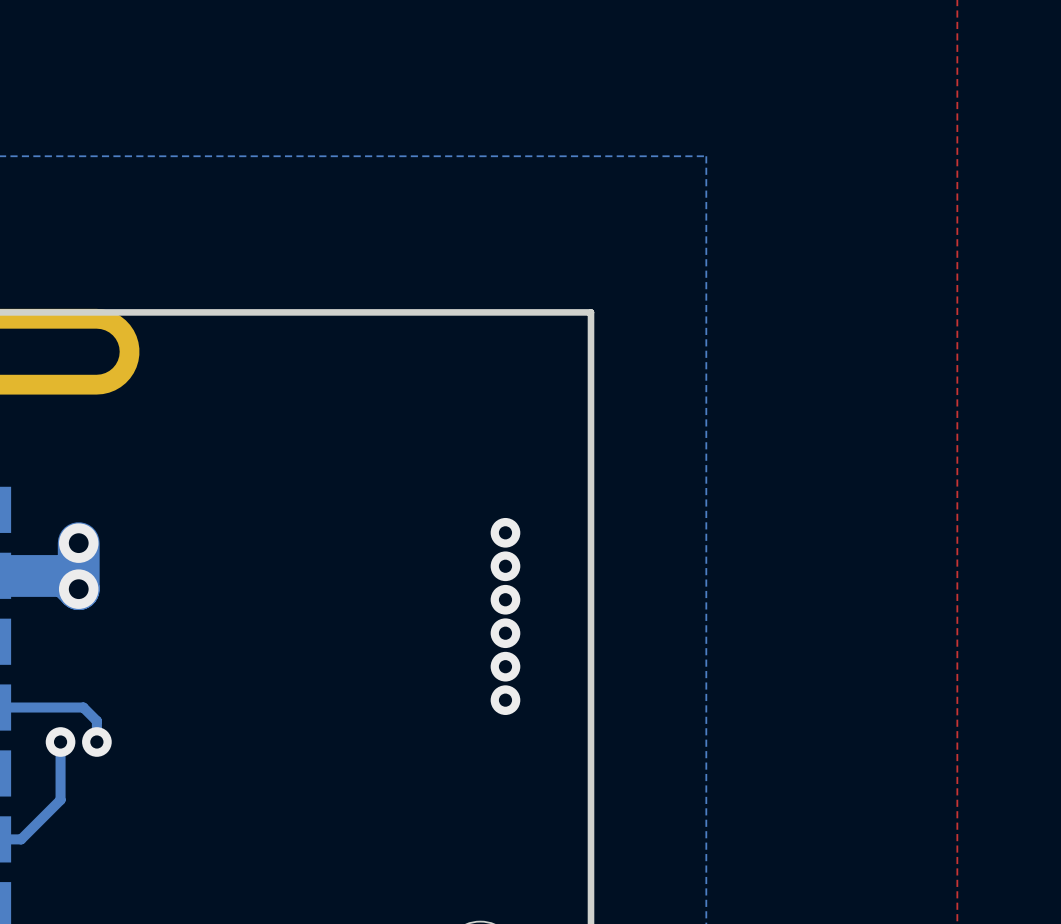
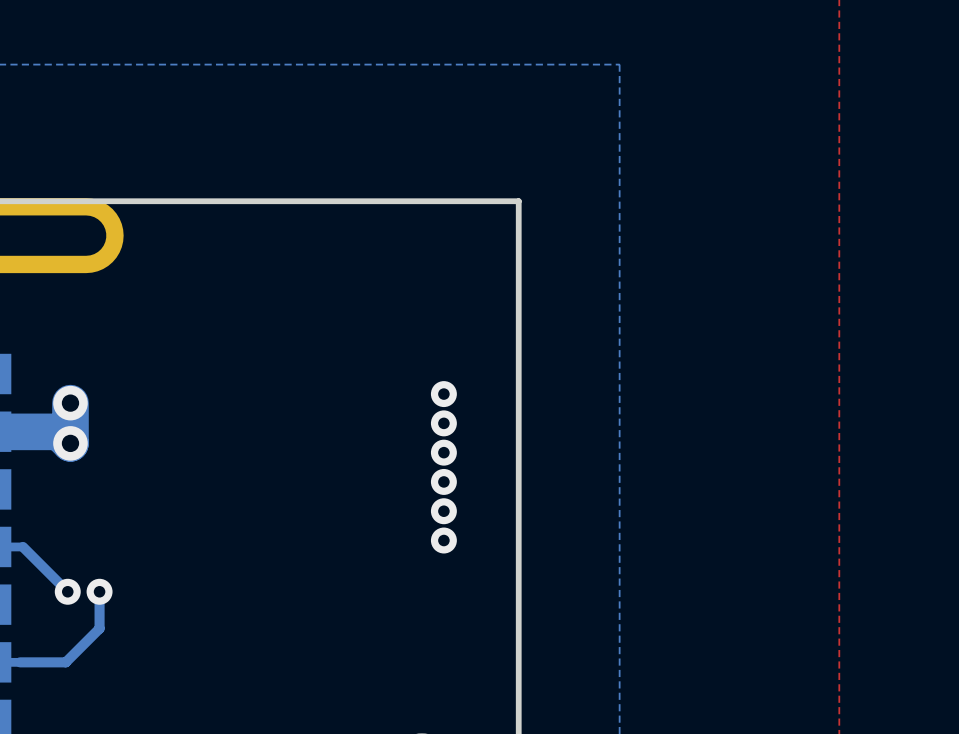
bottom track: (24, 707) (83, 707) (96, 721) (96, 741) -> (22, 546) (67, 591)
bottom track: (60, 741) (60, 799) (21, 839) -> (99, 591) (99, 628) (65, 662) (20, 662)
via: (60, 741) -> none
via: (96, 741) -> none
via: none -> (67, 591)
via: none -> (99, 591)

